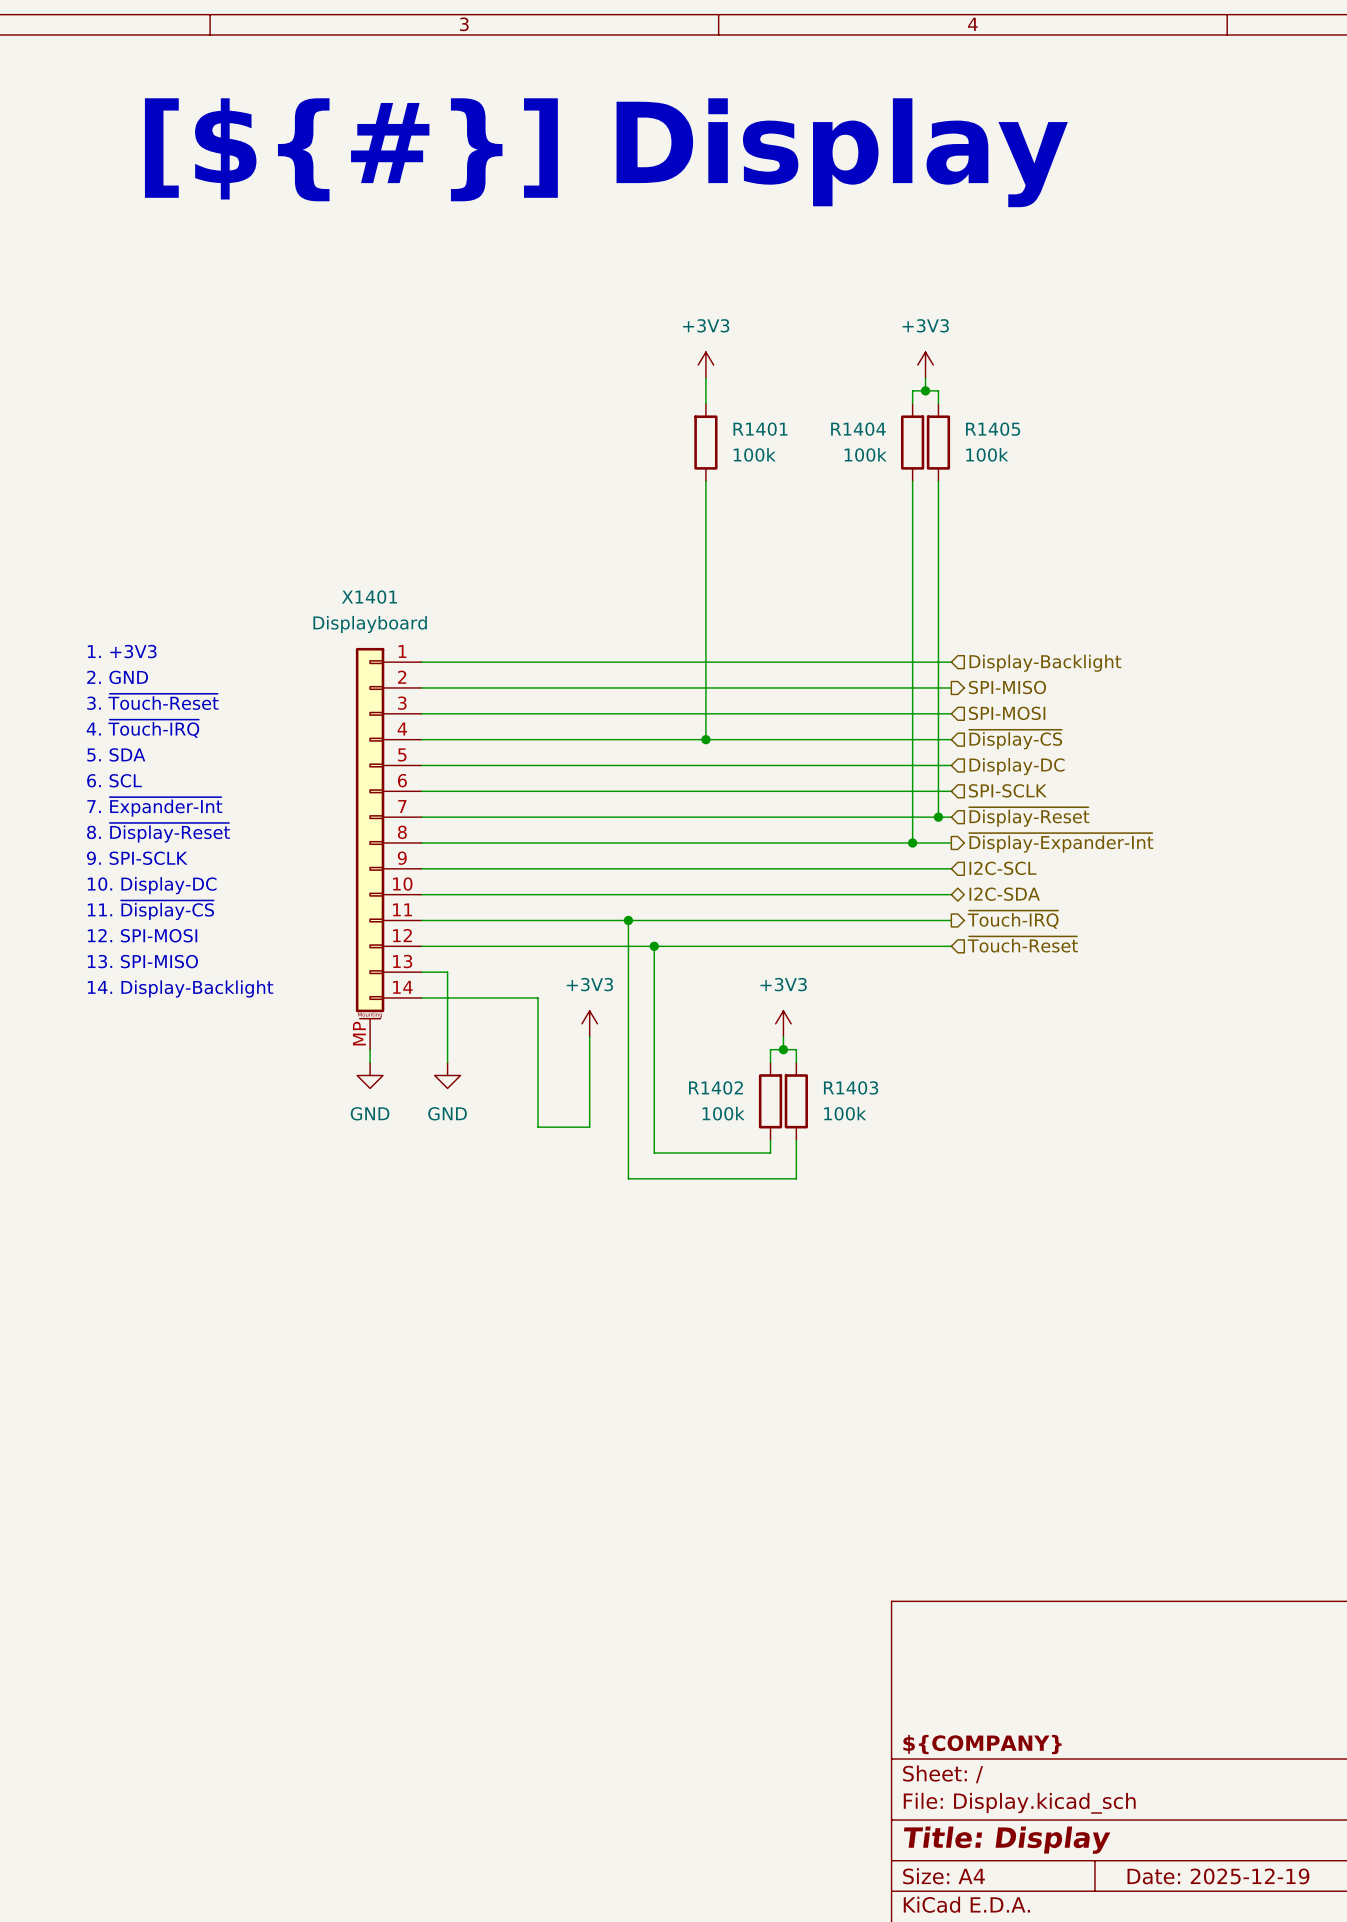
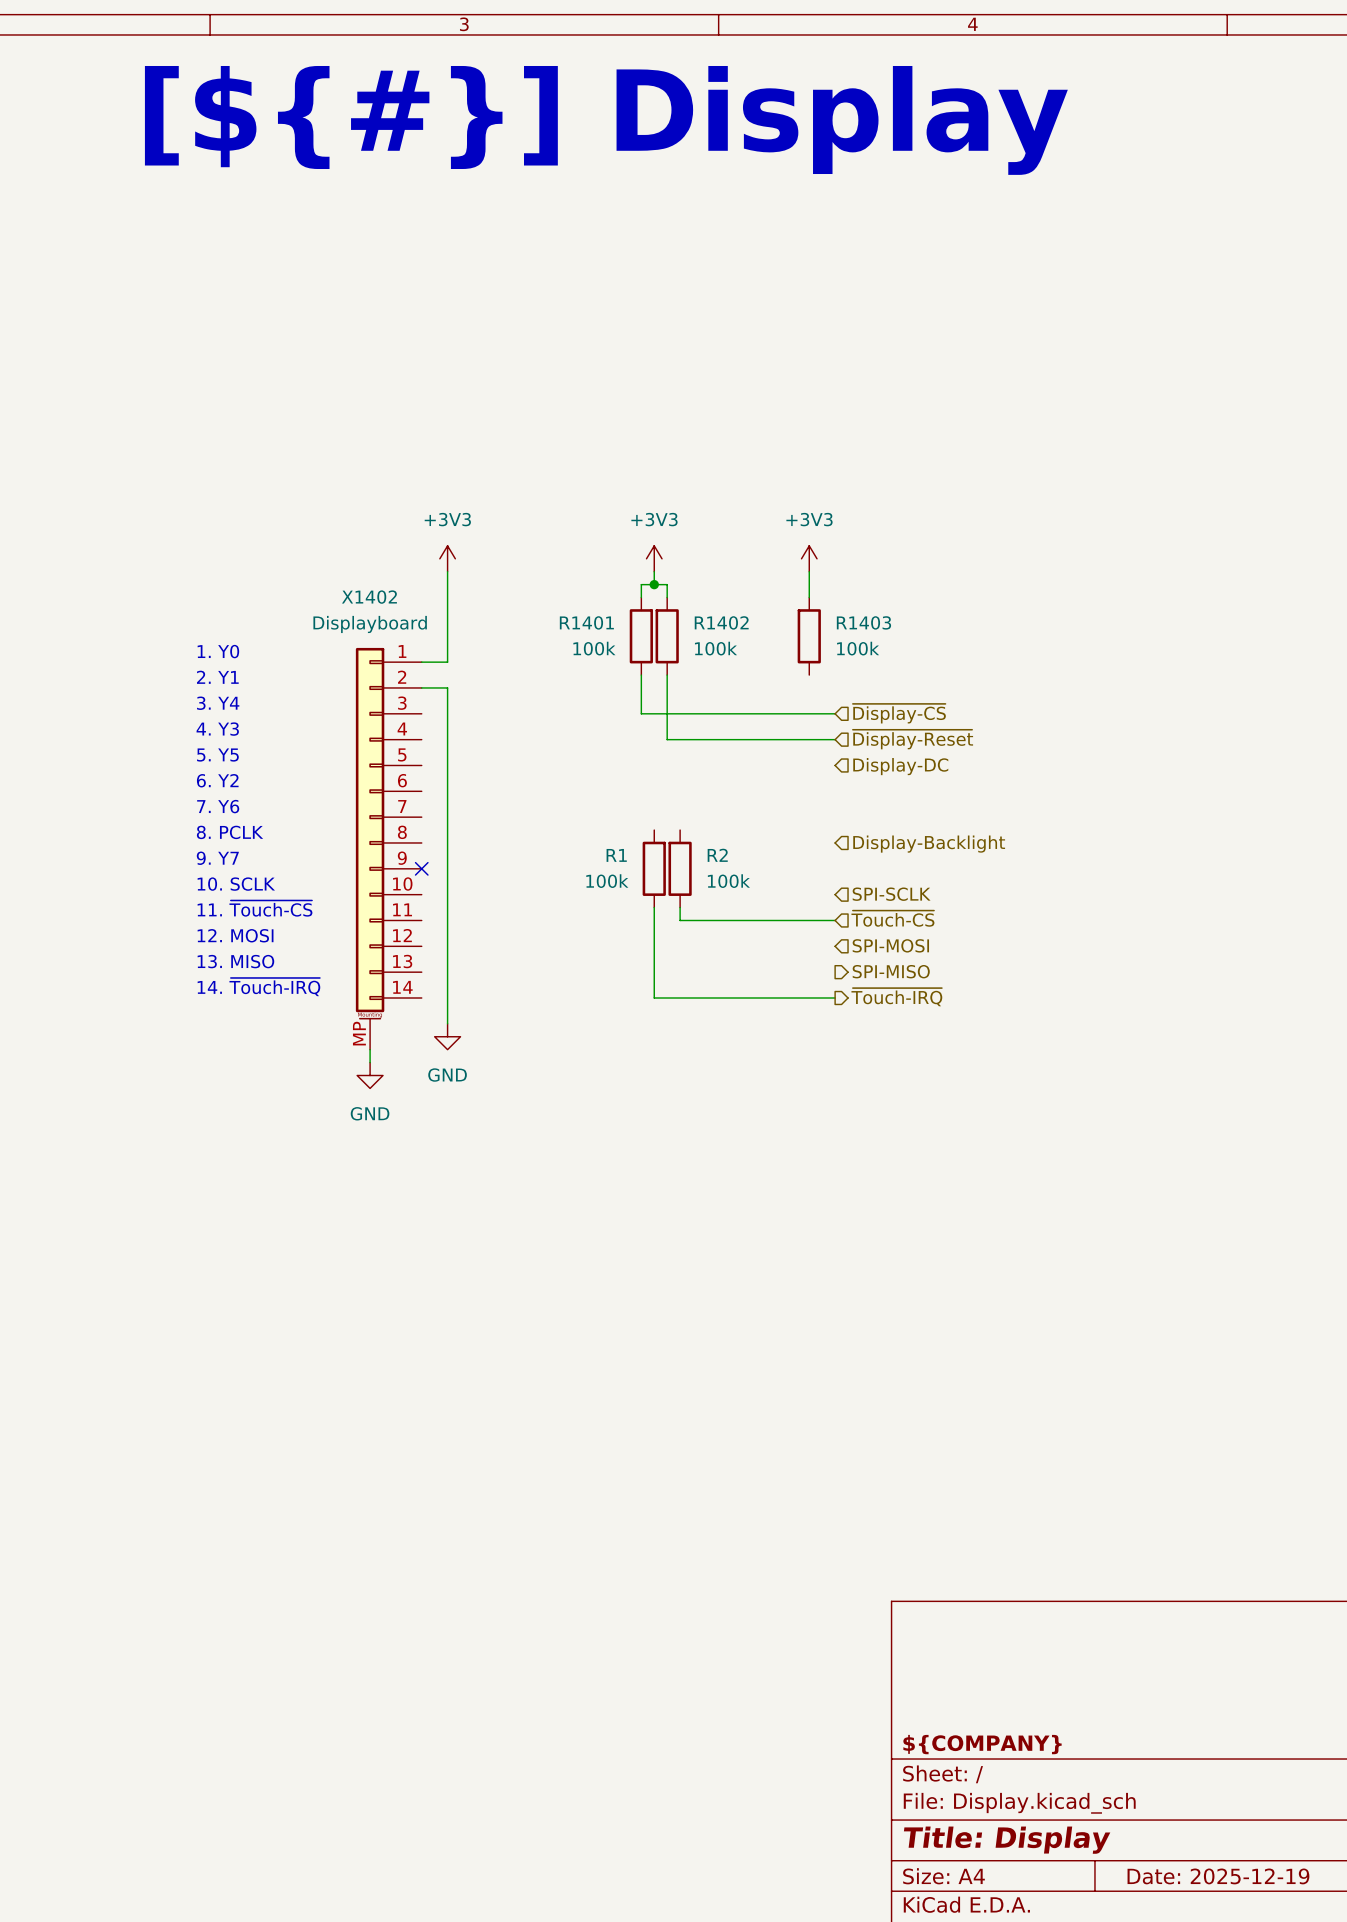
text position: [${#}] Display (606, 152) -> [${#}] Display (606, 120)
power symbol: +3V3 (705, 365) -> none
power symbol: +3V3 (925, 365) -> none
wire: (705, 377) (705, 403) -> (809, 571) (809, 597)
wire: (925, 377) (925, 390) -> none
junction: (925, 390) -> none
wire: (912, 403) (912, 390) (938, 390) (938, 403) -> none
R1401 name position: R1401 (760, 429) -> R1401 (586, 622)
R1401 position: (705, 442) -> (641, 636)
R1404: 100k (912, 442) -> none
R1405: 100k (938, 442) -> none
R1401 value position: 100k (754, 454) -> 100k (594, 648)
wire: (705, 481) (705, 739) -> none
wire: (912, 481) (912, 842) -> none
wire: (938, 481) (938, 817) -> none
power symbol: none -> +3V3 (447, 558)
power symbol: none -> +3V3 (654, 558)
power symbol: none -> +3V3 (809, 558)
wire: none -> (654, 571) (654, 584)
junction: none -> (654, 584)
X1401 name: X1401 (369, 597) -> X1402 (369, 597)
wire: none -> (641, 597) (641, 584) (667, 584) (667, 597)
text: 1. +3V3 (122, 651) -> none
text: none -> 1. Y0 (218, 651)
wire: (447, 662) (951, 662) -> (447, 662) (447, 571)
hierarchical label position: Display-Backlight (1045, 663) -> Display-Backlight (929, 844)
text: 2. GND (117, 677) -> none
text: none -> 2. Y1 (217, 677)
wire: (447, 687) (951, 687) -> none
hierarchical label: SPI-MISO (1007, 687) -> none
text: 3. ~{Touch-Reset} (152, 701) -> none
text: none -> 3. Y4 (218, 703)
wire: (421, 713) (641, 713) -> (641, 675) (641, 713)
wire: (835, 713) (951, 713) -> none
hierarchical label: SPI-MOSI (1007, 713) -> none
text: 4. ~{Touch-IRQ} (142, 728) -> none
text: none -> 4. Y3 (217, 729)
wire: (421, 739) (667, 739) -> (667, 675) (667, 739)
junction: (705, 739) -> none
wire: (835, 739) (951, 739) -> none
hierarchical label position: ~{Display-CS} (1015, 739) -> ~{Display-CS} (899, 713)
text: 5. SDA (116, 754) -> none
text: none -> 5. Y5 (217, 755)
wire: (421, 765) (951, 765) -> none
hierarchical label position: Display-DC (1017, 766) -> Display-DC (900, 766)
text: 6. SCL (114, 780) -> none
text: none -> 6. Y2 (217, 780)
hierarchical label position: SPI-SCLK (1007, 790) -> SPI-SCLK (891, 894)
wire: (421, 791) (951, 791) -> none
text: 7. ~{Expander-Int} (154, 806) -> none
text: none -> 7. Y6 (218, 806)
wire: (421, 817) (951, 817) -> none
junction: (938, 817) -> none
hierarchical label position: ~{Display-Reset} (1029, 817) -> ~{Display-Reset} (912, 739)
text: 8. ~{Display-Reset} (158, 832) -> none
text: none -> 8. PCLK (230, 832)
wire: (421, 842) (951, 842) -> none
junction: (912, 842) -> none
hierarchical label: ~{Display-Expander-Int} (1061, 842) -> none
text: 9. SPI-SCLK (137, 858) -> none
text: none -> 9. Y7 (217, 858)
wire: (421, 868) (951, 868) -> none
no-connect mark: none -> (421, 868)
R1: none -> 100k (654, 868)
R2: none -> 100k (680, 868)
hierarchical label: I2C-SCL (1002, 868) -> none
text: none -> 10. SCLK (236, 884)
text: 10. Display-DC (152, 885) -> none
wire: (421, 894) (951, 894) -> none
hierarchical label: I2C-SDA (1004, 894) -> none
text: 11. ~{Display-CS} (150, 910) -> 11. ~{Touch-CS} (255, 908)
hierarchical label position: ~{Touch-IRQ} (1013, 919) -> ~{Touch-IRQ} (896, 997)
wire: (421, 920) (680, 920) -> (680, 907) (680, 920)
wire: (628, 920) (628, 1178) (796, 1178) (796, 1140) -> none
junction: (628, 920) -> none
wire: (835, 920) (951, 920) -> none
text: 12. SPI-MOSI (142, 935) -> 12. MOSI (235, 935)
hierarchical label: ~{Touch-Reset} (1022, 944) -> ~{Touch-CS} (892, 918)
hierarchical label: none -> SPI-MOSI (890, 945)
wire: (421, 946) (951, 946) -> none
junction: (654, 946) -> none
text: 13. SPI-MISO (142, 961) -> 13. MISO (235, 961)
hierarchical label: none -> SPI-MISO (891, 971)
wire: (421, 972) (447, 972) -> (447, 687) (447, 972)
text: none -> 14. ~{Touch-IRQ} (258, 987)
text: 14. Display-Backlight (180, 988) -> none
wire: (421, 998) (538, 998) (538, 1127) (589, 1127) (589, 1036) -> none
wire: (654, 998) (654, 1153) (770, 1153) (770, 1140) -> (654, 998) (835, 998)
wire: (447, 1023) (447, 1062) -> (654, 907) (654, 946)
power symbol: +3V3 (589, 1023) -> none
power symbol: +3V3 (783, 1023) -> none
wire: (783, 1036) (783, 1049) -> none
junction: (783, 1049) -> none
wire: (770, 1062) (770, 1049) (796, 1049) (796, 1062) -> none
power symbol position: GND (447, 1075) -> GND (447, 1036)
R1402 name position: R1402 (715, 1087) -> R1402 (721, 622)
R1402 position: (770, 1101) -> (667, 636)
R1403 position: (796, 1101) -> (809, 636)
R1402 value position: 100k (723, 1113) -> 100k (716, 648)

